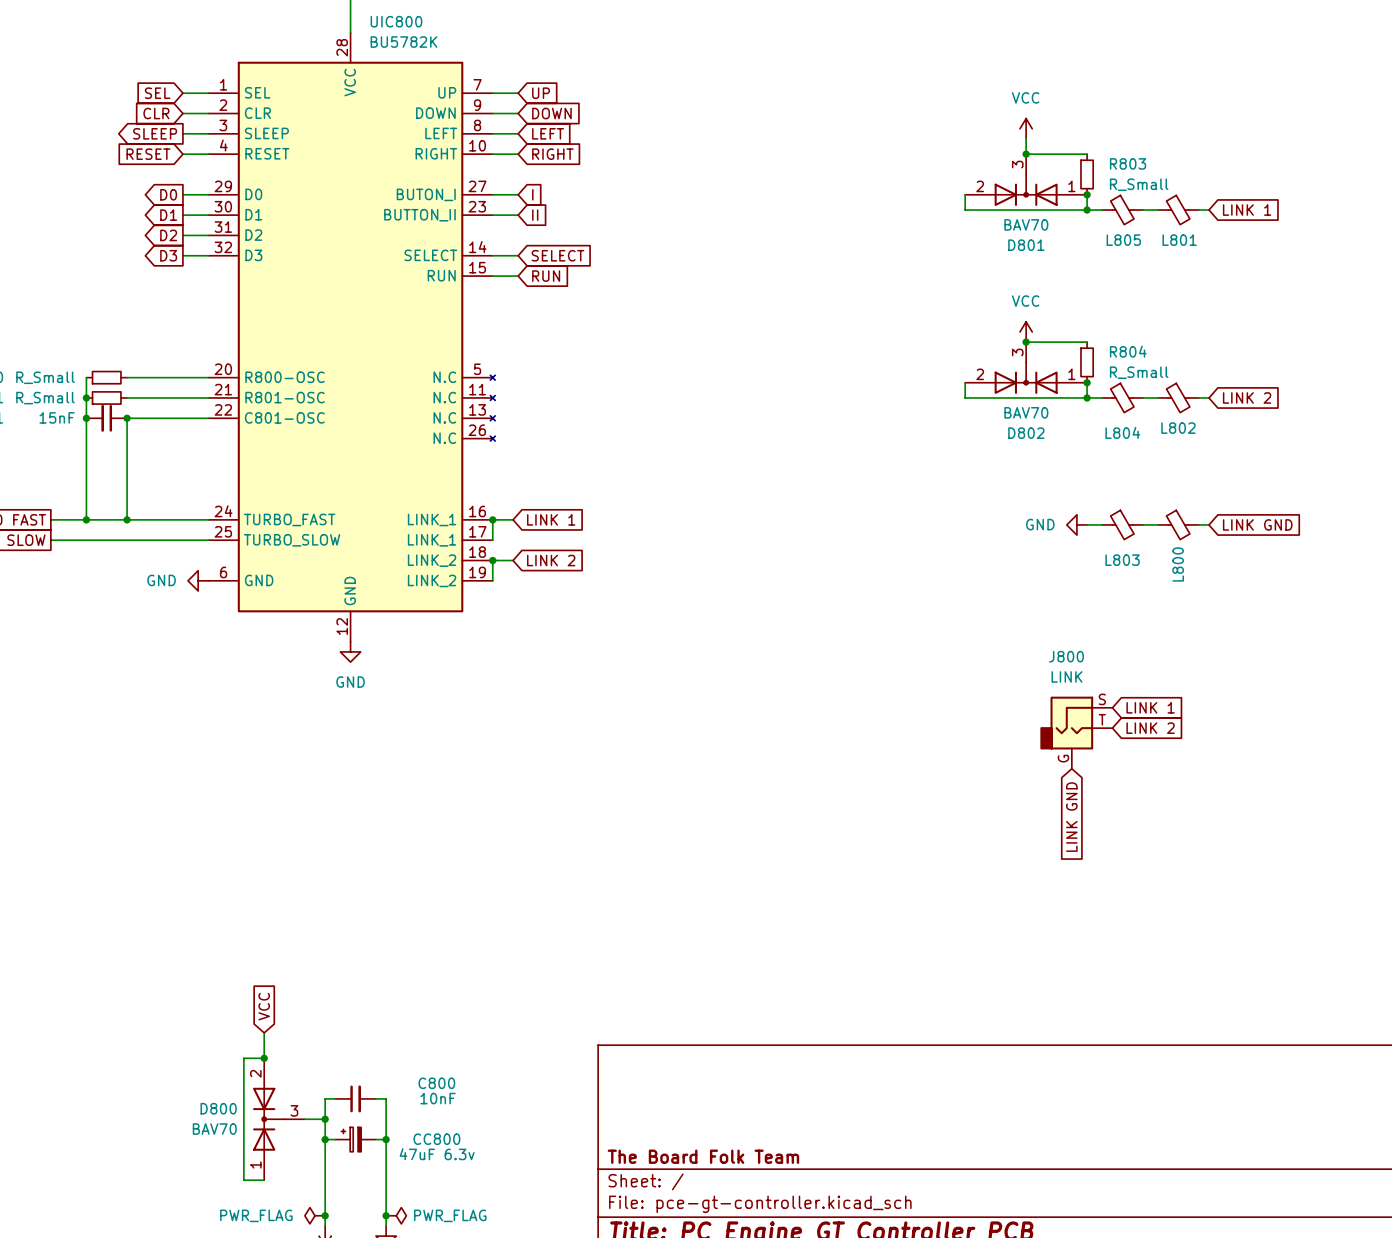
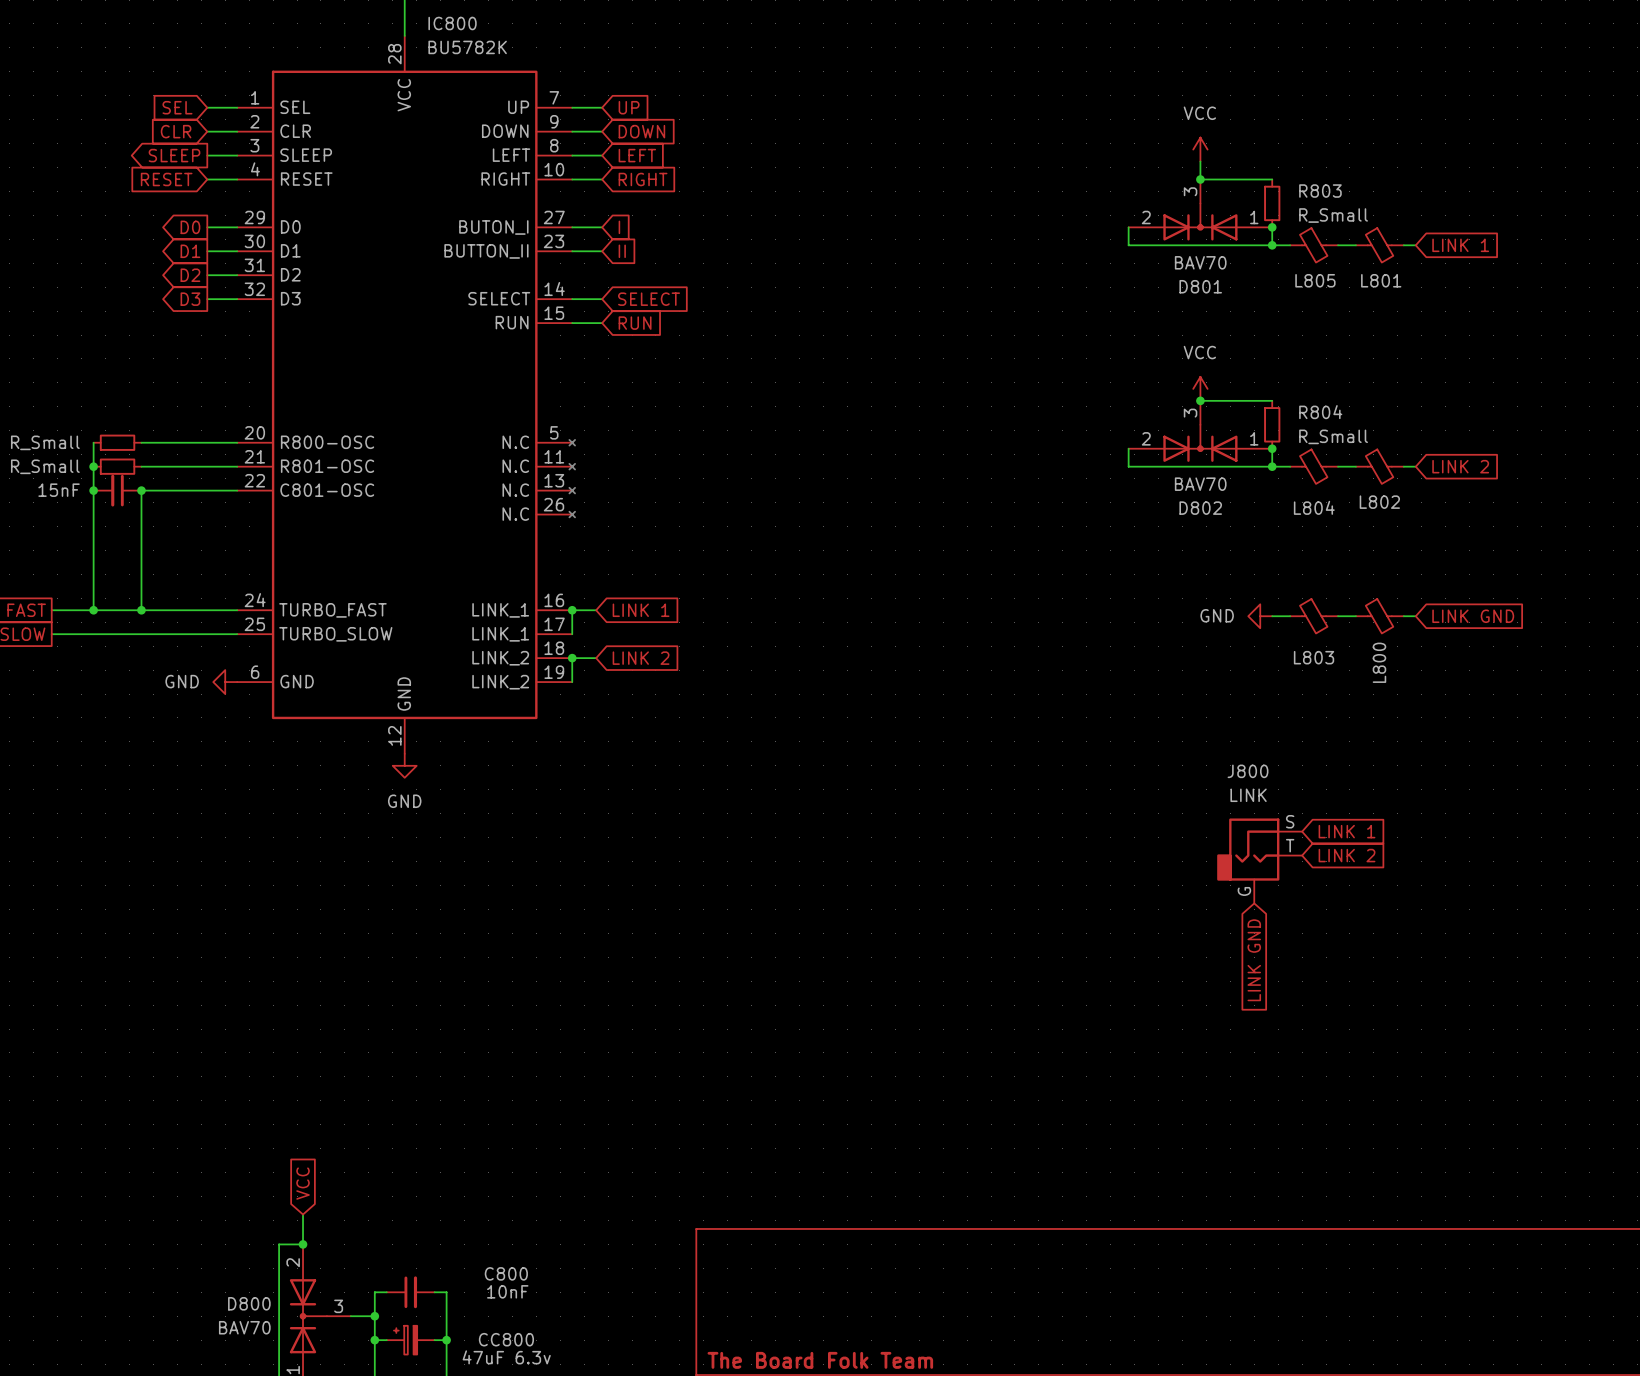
UIC800 name: UIC800 (396, 21) -> IC800 (452, 23)

